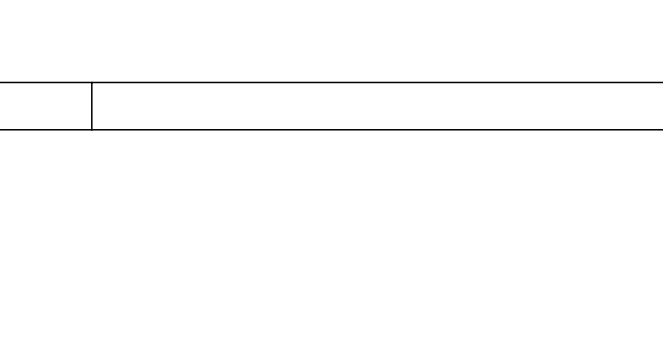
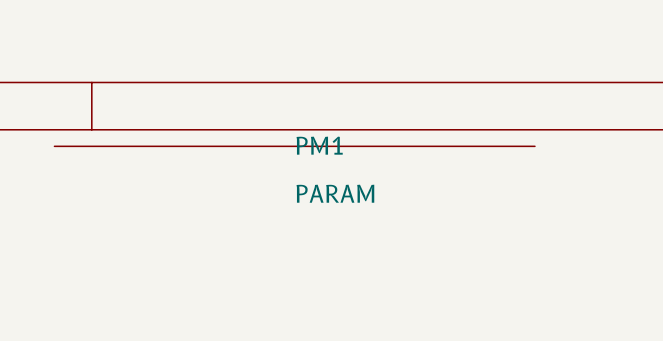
PM1: none -> PARAM (294, 146)

